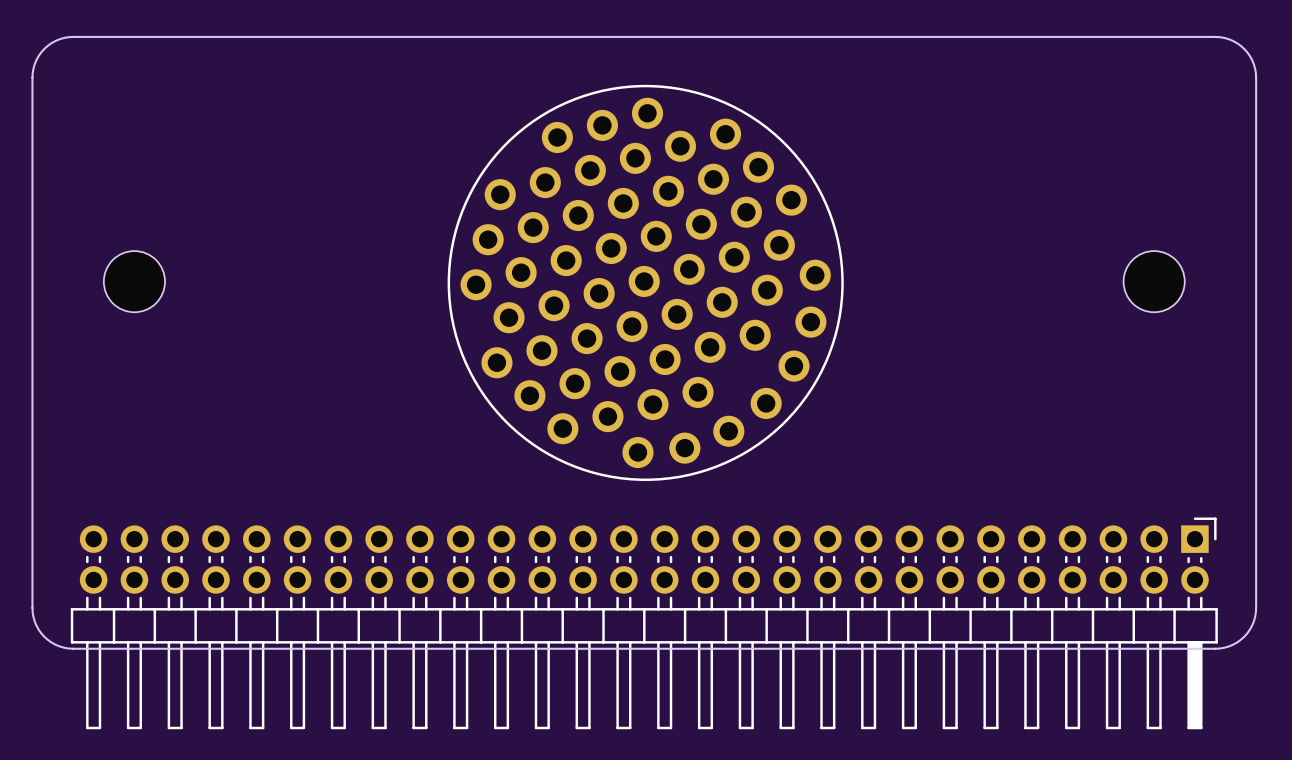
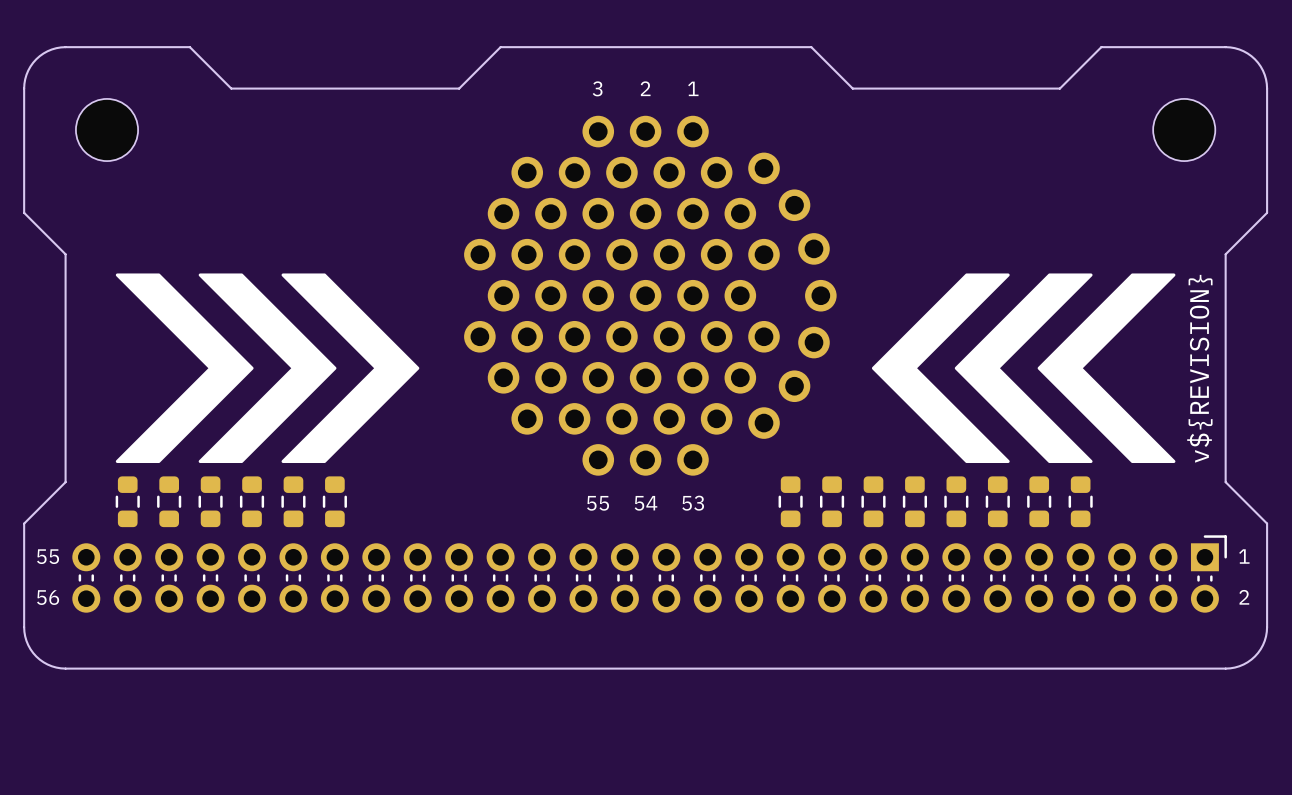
board edge: (195, 36) (501, 36) -> (189, 47) (231, 88) (459, 88) (500, 47)
board edge: (807, 36) (1092, 36) -> (811, 47) (852, 88) (1059, 88) (1101, 47)
text: none -> 2 (645, 88)
text: none -> 3 (597, 88)
text: none -> 1 (693, 88)
part footprint: [447, 84, 844, 481] -> [464, 115, 837, 476]
board edge: (32, 200) (32, 505) -> (24, 212) (65, 254) (65, 482) (24, 523)
board edge: (1256, 200) (1256, 505) -> (1267, 212) (1225, 254) (1225, 482) (1267, 523)
drawing: none -> [115, 273, 420, 464]
drawing: none -> [871, 273, 1176, 464]
part position: (134, 281) -> (107, 130)
part position: (1154, 281) -> (1184, 130)
text: none -> v${REVISION} (1199, 368)
part: none -> (127, 501)
part: none -> (169, 501)
part: none -> (210, 501)
part: none -> (252, 501)
part: none -> (293, 501)
part: none -> (334, 501)
part: none -> (790, 501)
part: none -> (832, 501)
part: none -> (873, 501)
part: none -> (914, 501)
part: none -> (956, 501)
part: none -> (997, 501)
part: none -> (1039, 501)
part: none -> (1080, 501)
text: none -> 53 (693, 503)
text: none -> 55 (598, 503)
text: none -> 54 (645, 503)
text: none -> 55 (48, 556)
text: none -> 1 (1244, 556)
text: none -> 56 (48, 597)
text: none -> 2 (1244, 597)
part: (644, 623) -> none

